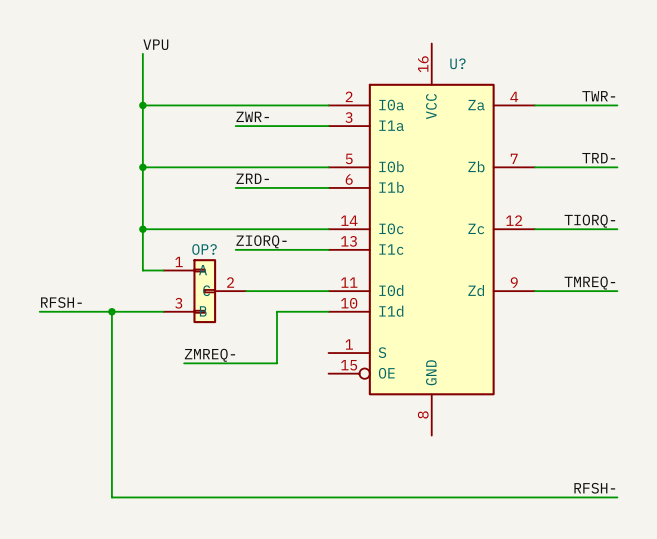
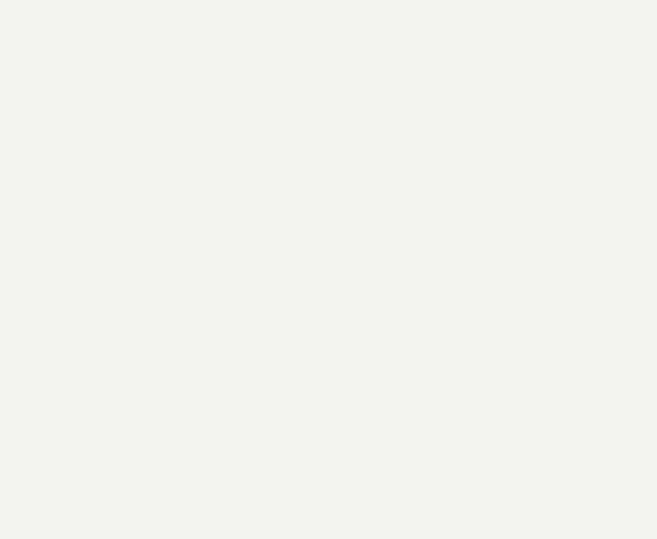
label: VPU (155, 44) -> none
wire: (142, 53) (142, 270) (163, 270) -> none
label: TWR- (598, 96) -> none
wire: (142, 105) (328, 105) -> none
junction: (142, 105) -> none
wire: (534, 105) (617, 105) -> none
label: ZWR- (252, 116) -> none
wire: (235, 126) (328, 126) -> none
label: TRD- (598, 158) -> none
wire: (142, 167) (328, 167) -> none
junction: (142, 167) -> none
wire: (534, 167) (617, 167) -> none
label: ZRD- (252, 178) -> none
wire: (235, 187) (328, 187) -> none
label: TIORQ- (589, 221) -> none
wire: (142, 229) (328, 229) -> none
junction: (142, 229) -> none
wire: (534, 229) (617, 229) -> none
U?: (431, 239) -> none
label: ZIORQ- (261, 241) -> none
wire: (235, 249) (328, 249) -> none
label: TMREQ- (589, 283) -> none
OP?: (204, 291) -> none
wire: (246, 291) (328, 291) -> none
wire: (534, 291) (617, 291) -> none
label: RFSH- (61, 302) -> none
wire: (39, 311) (163, 311) -> none
wire: (111, 311) (111, 497) (617, 497) -> none
junction: (111, 311) -> none
wire: (328, 311) (276, 311) (276, 363) (184, 363) -> none
label: ZMREQ- (209, 355) -> none
label: RFSH- (594, 488) -> none

